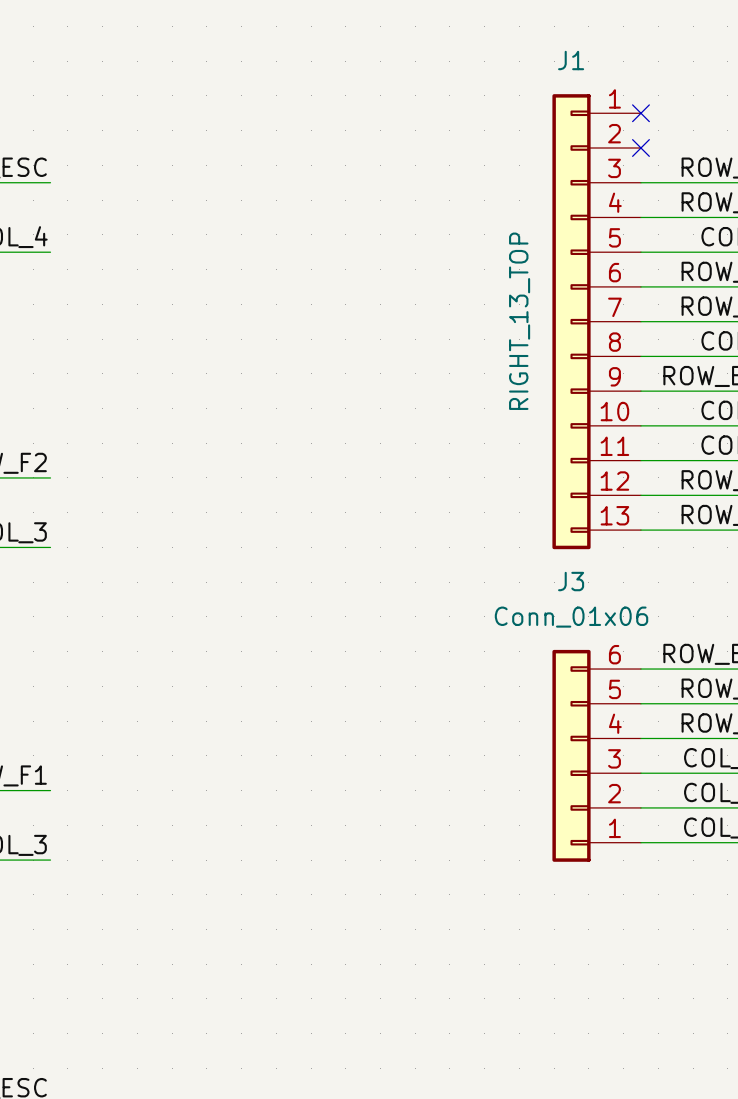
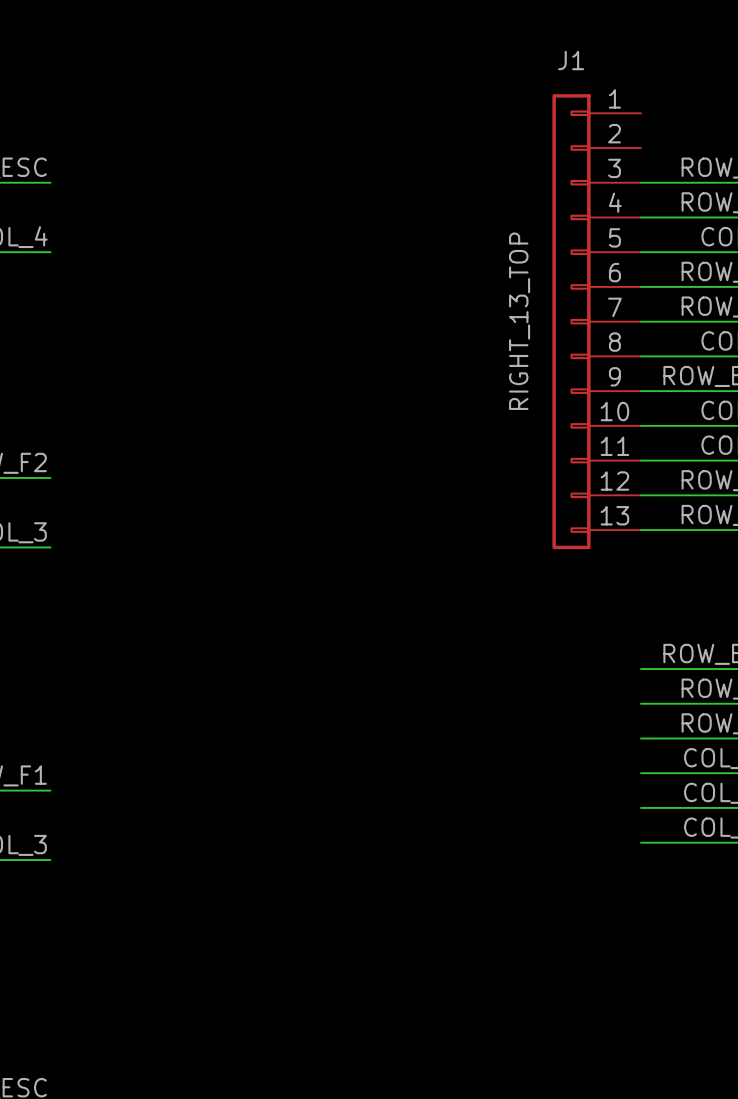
no-connect mark: (640, 113) -> none
no-connect mark: (640, 147) -> none
J3: Conn_01x06 (596, 755) -> none

